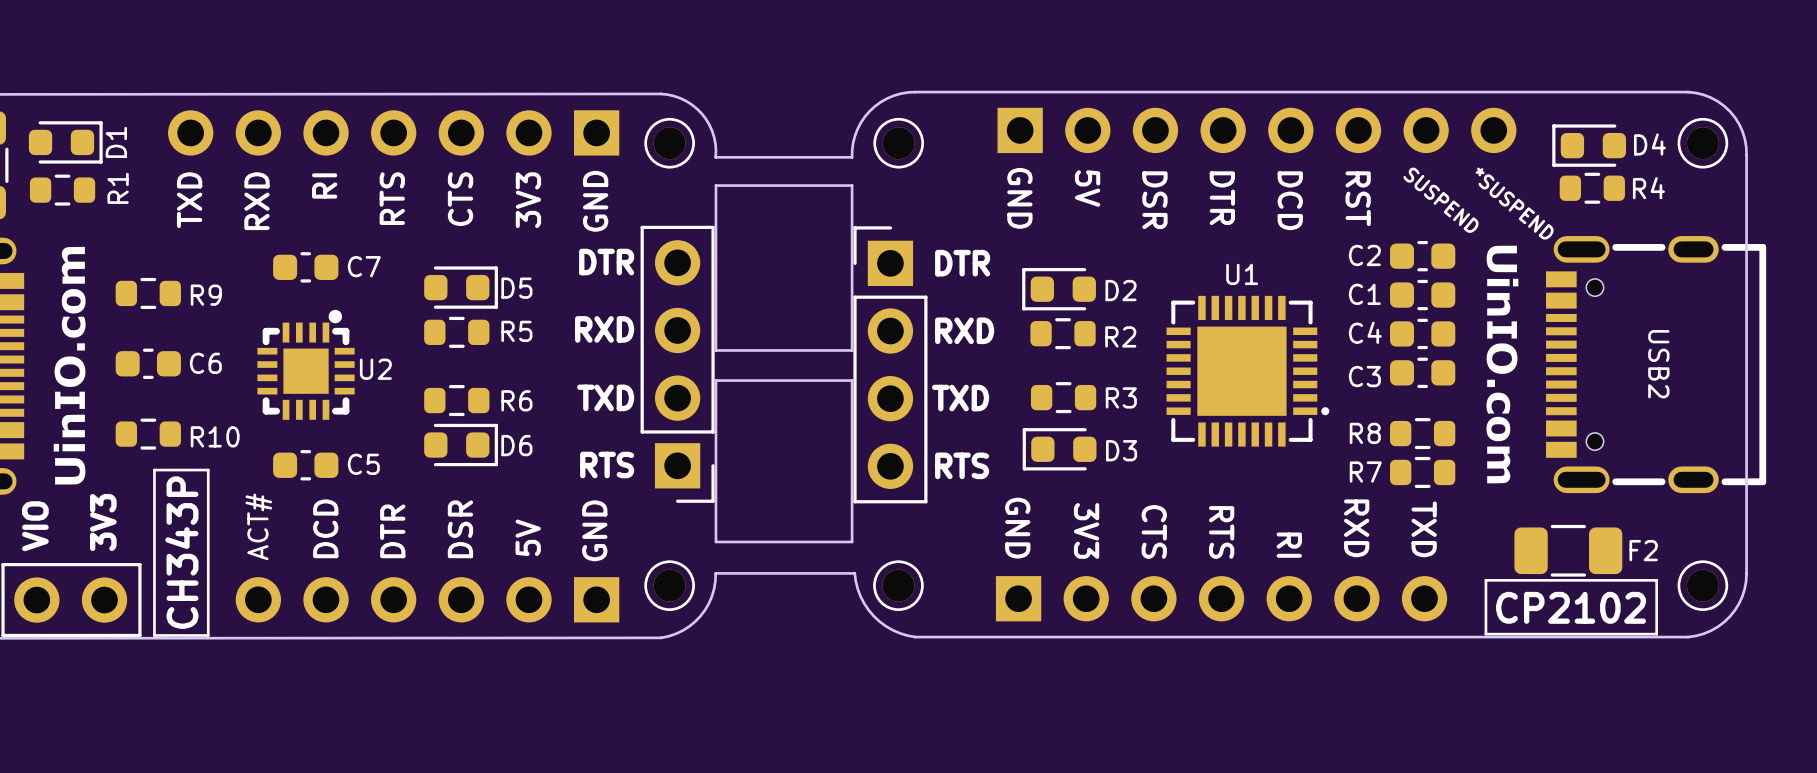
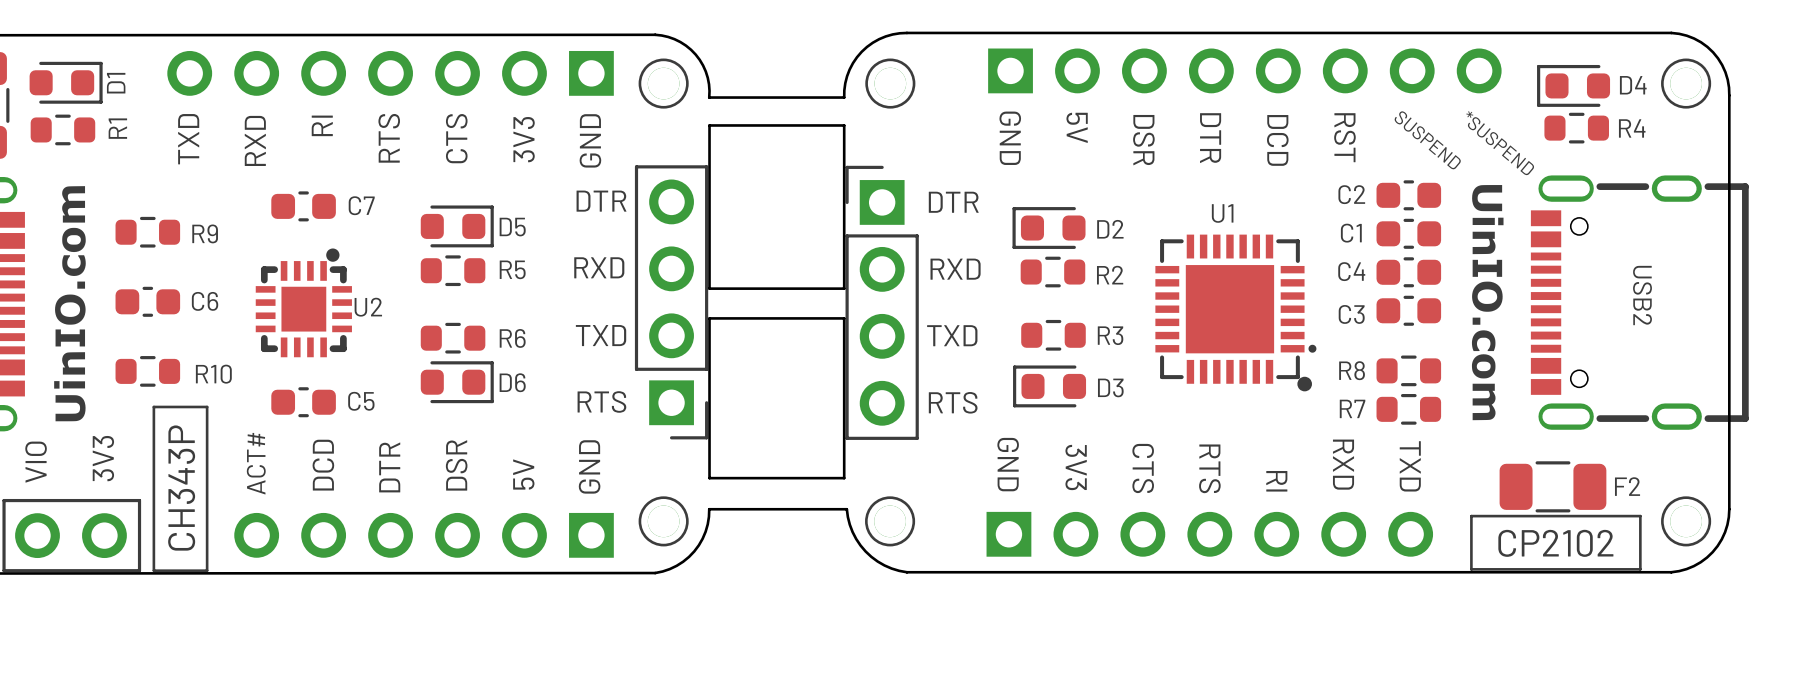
drawing: none -> [1297, 376, 1312, 392]

